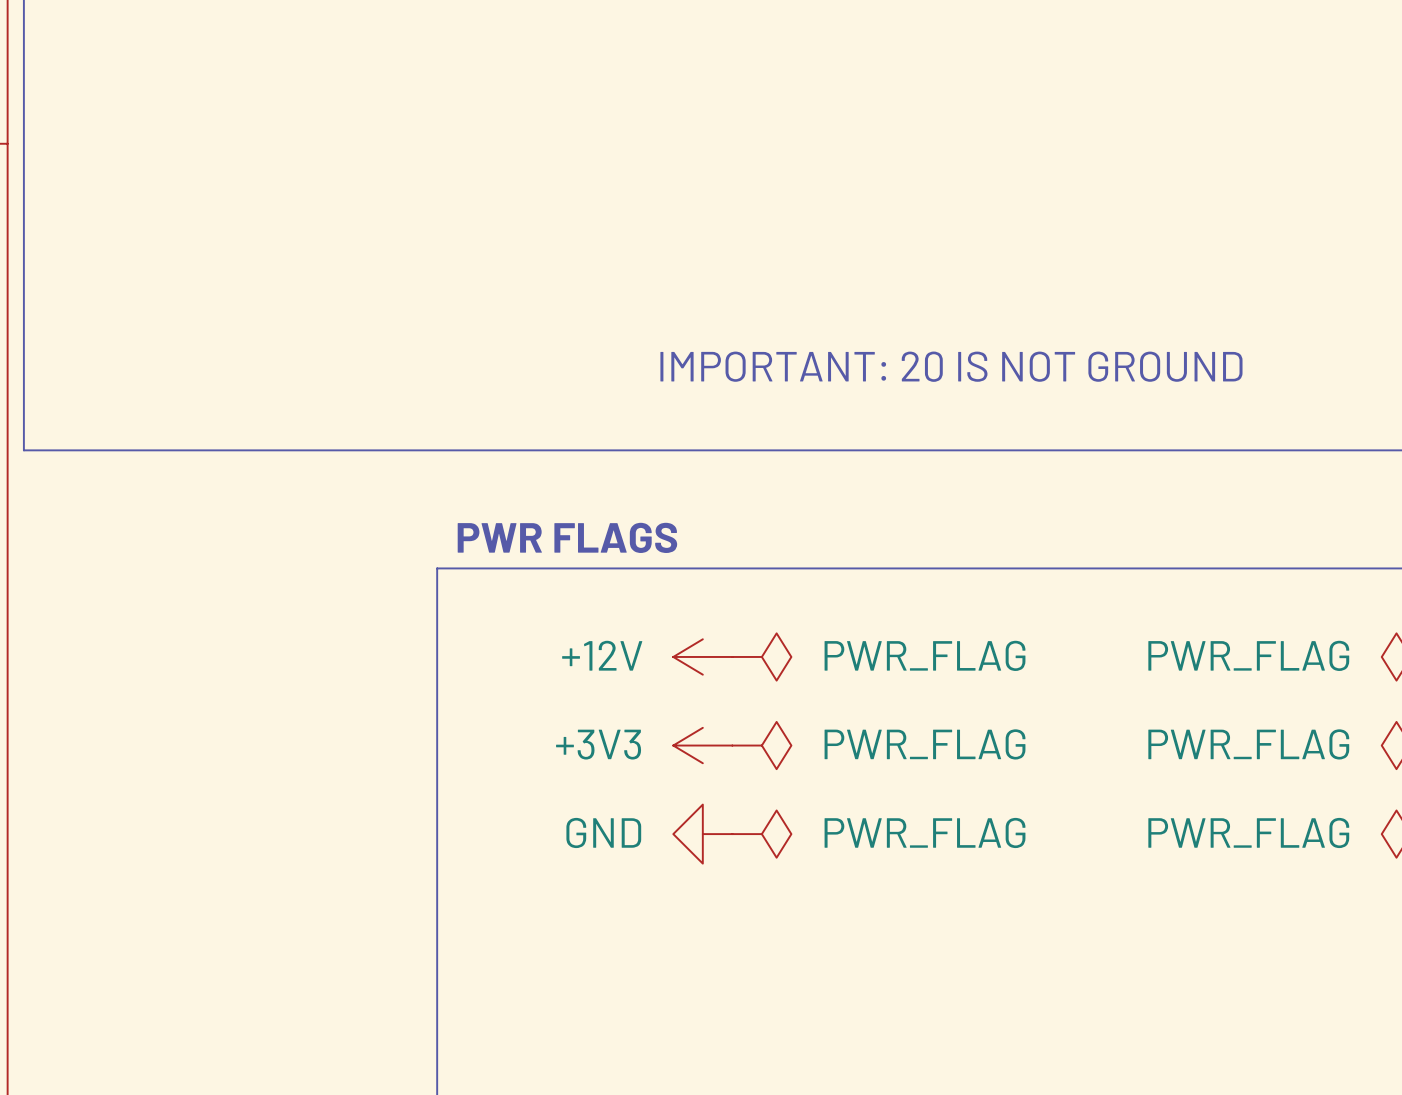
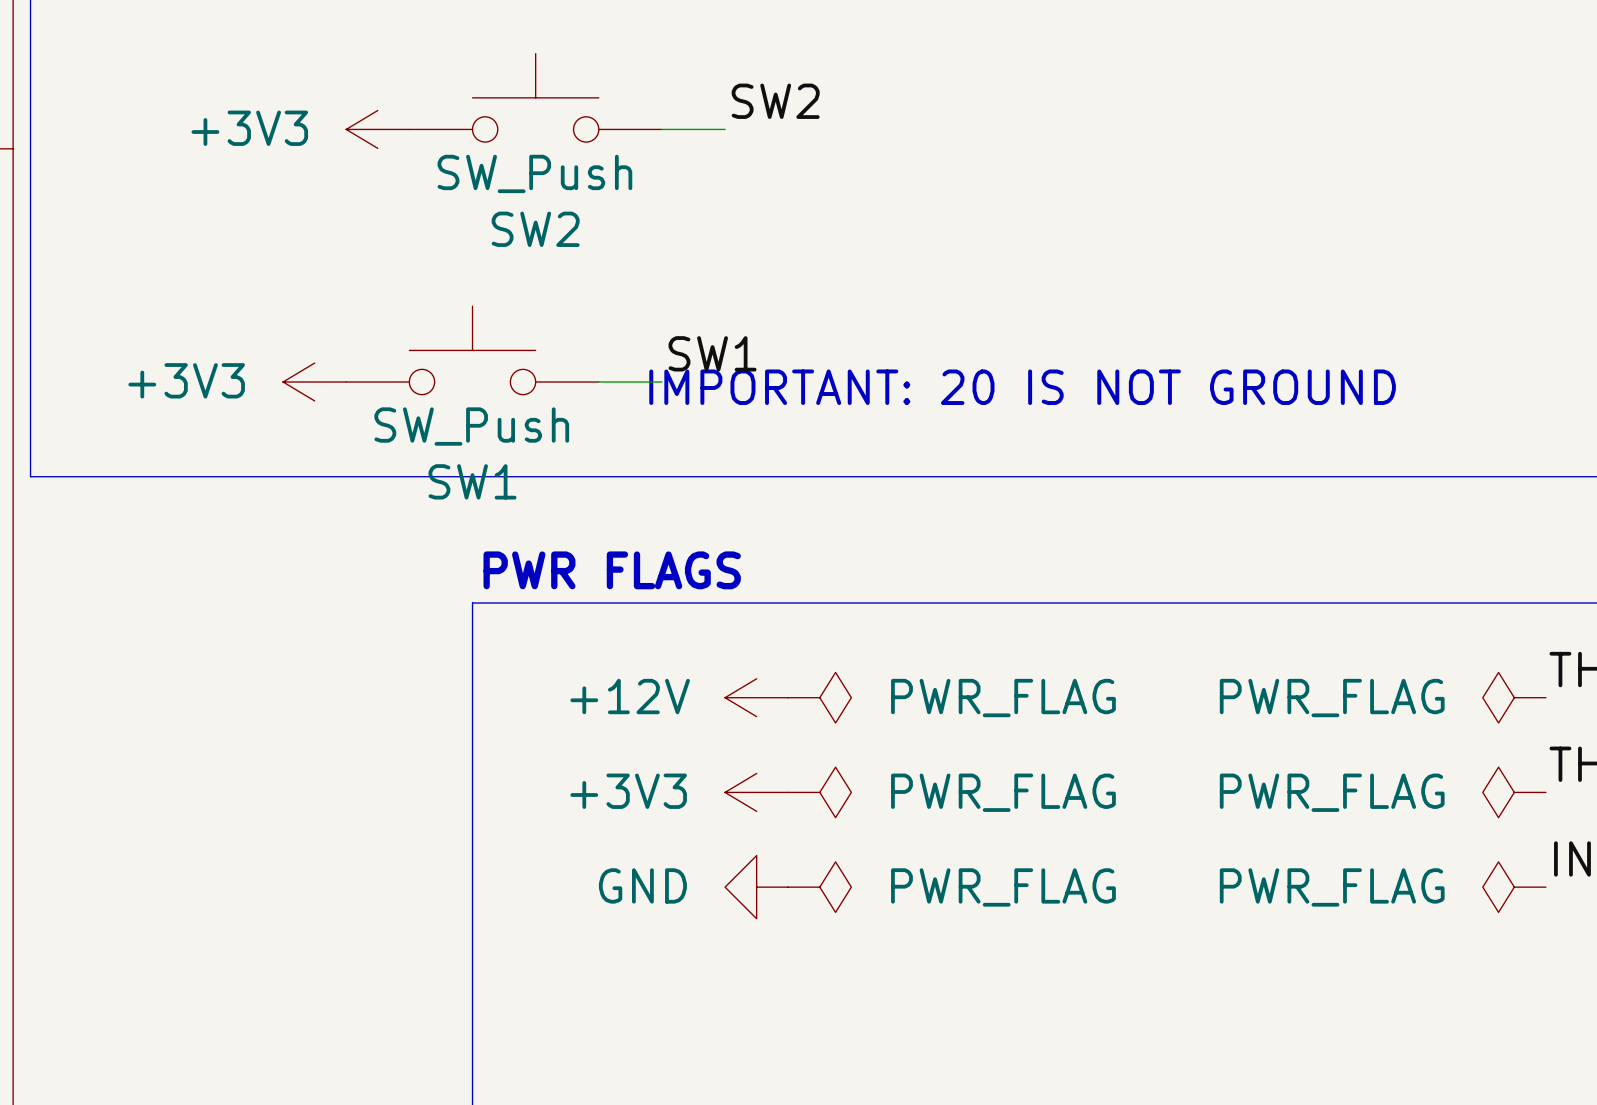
SW2: none -> SW_Push (535, 97)
label: none -> SW2 (775, 101)
power symbol: none -> +3V3 (377, 129)
wire: none -> (661, 129) (725, 129)
SW1: none -> SW_Push (472, 350)
label: none -> SW1 (712, 353)
power symbol: none -> +3V3 (314, 382)
wire: none -> (598, 382) (661, 382)

